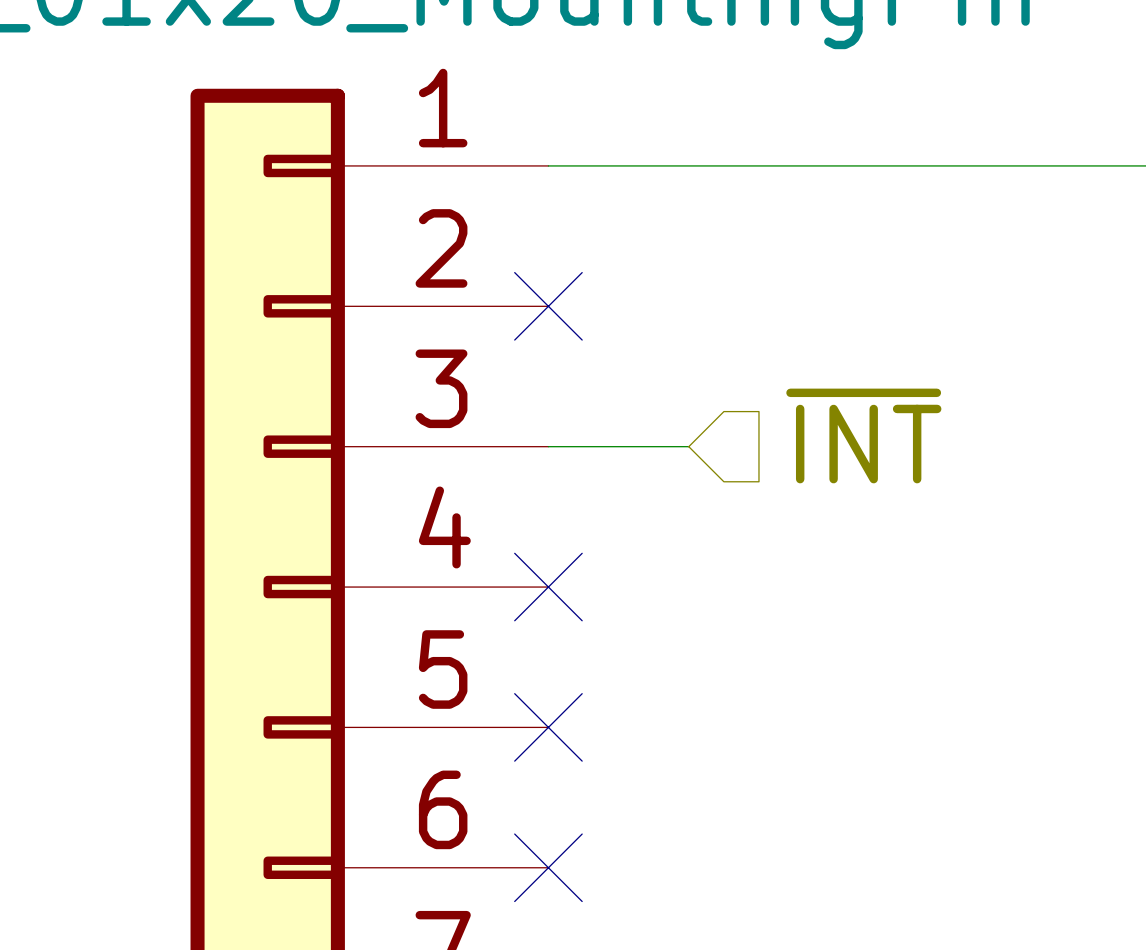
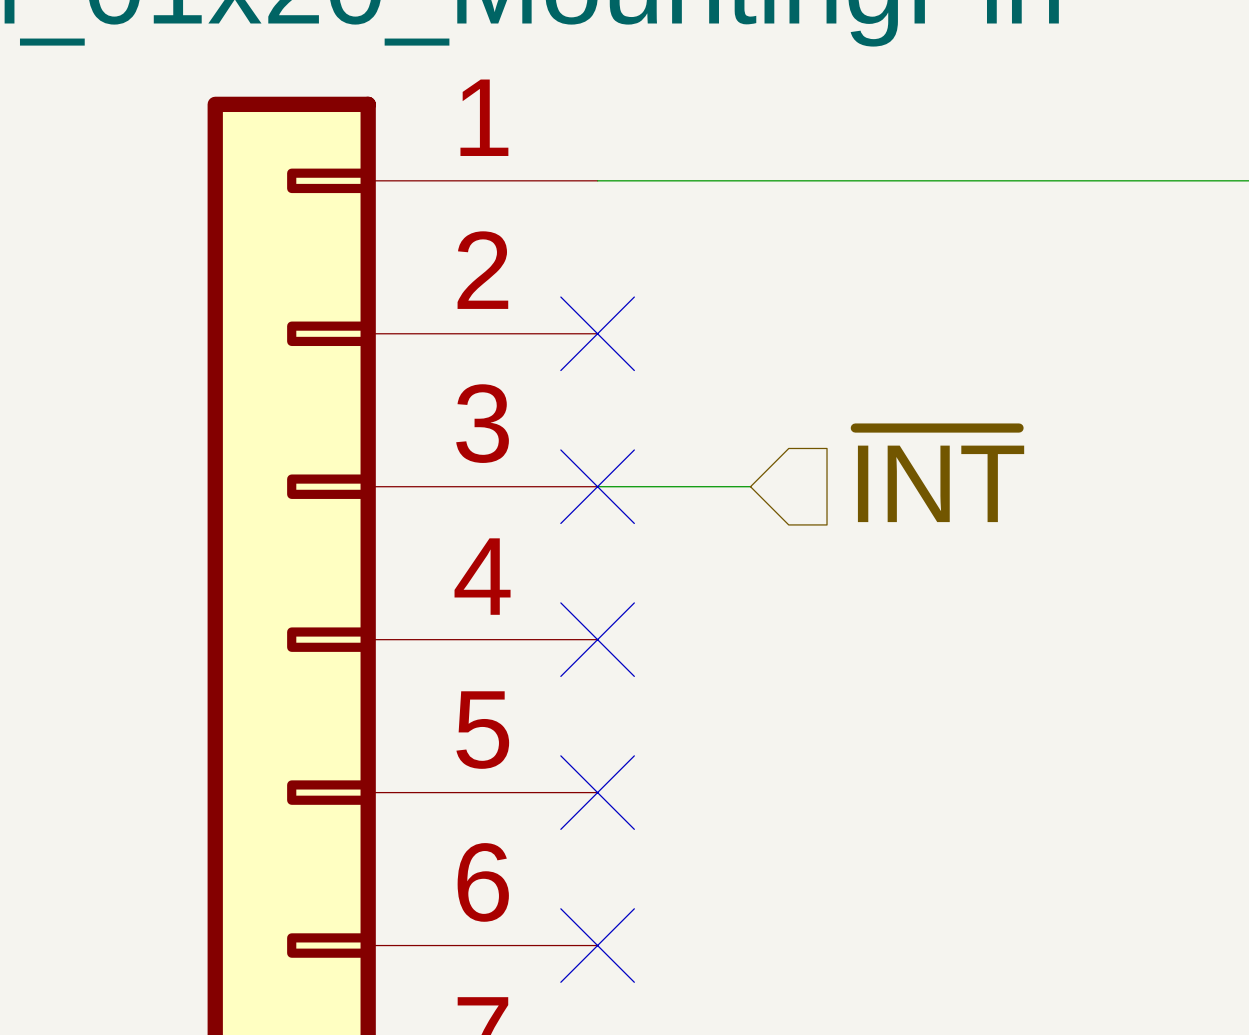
no-connect mark: none -> (597, 486)

